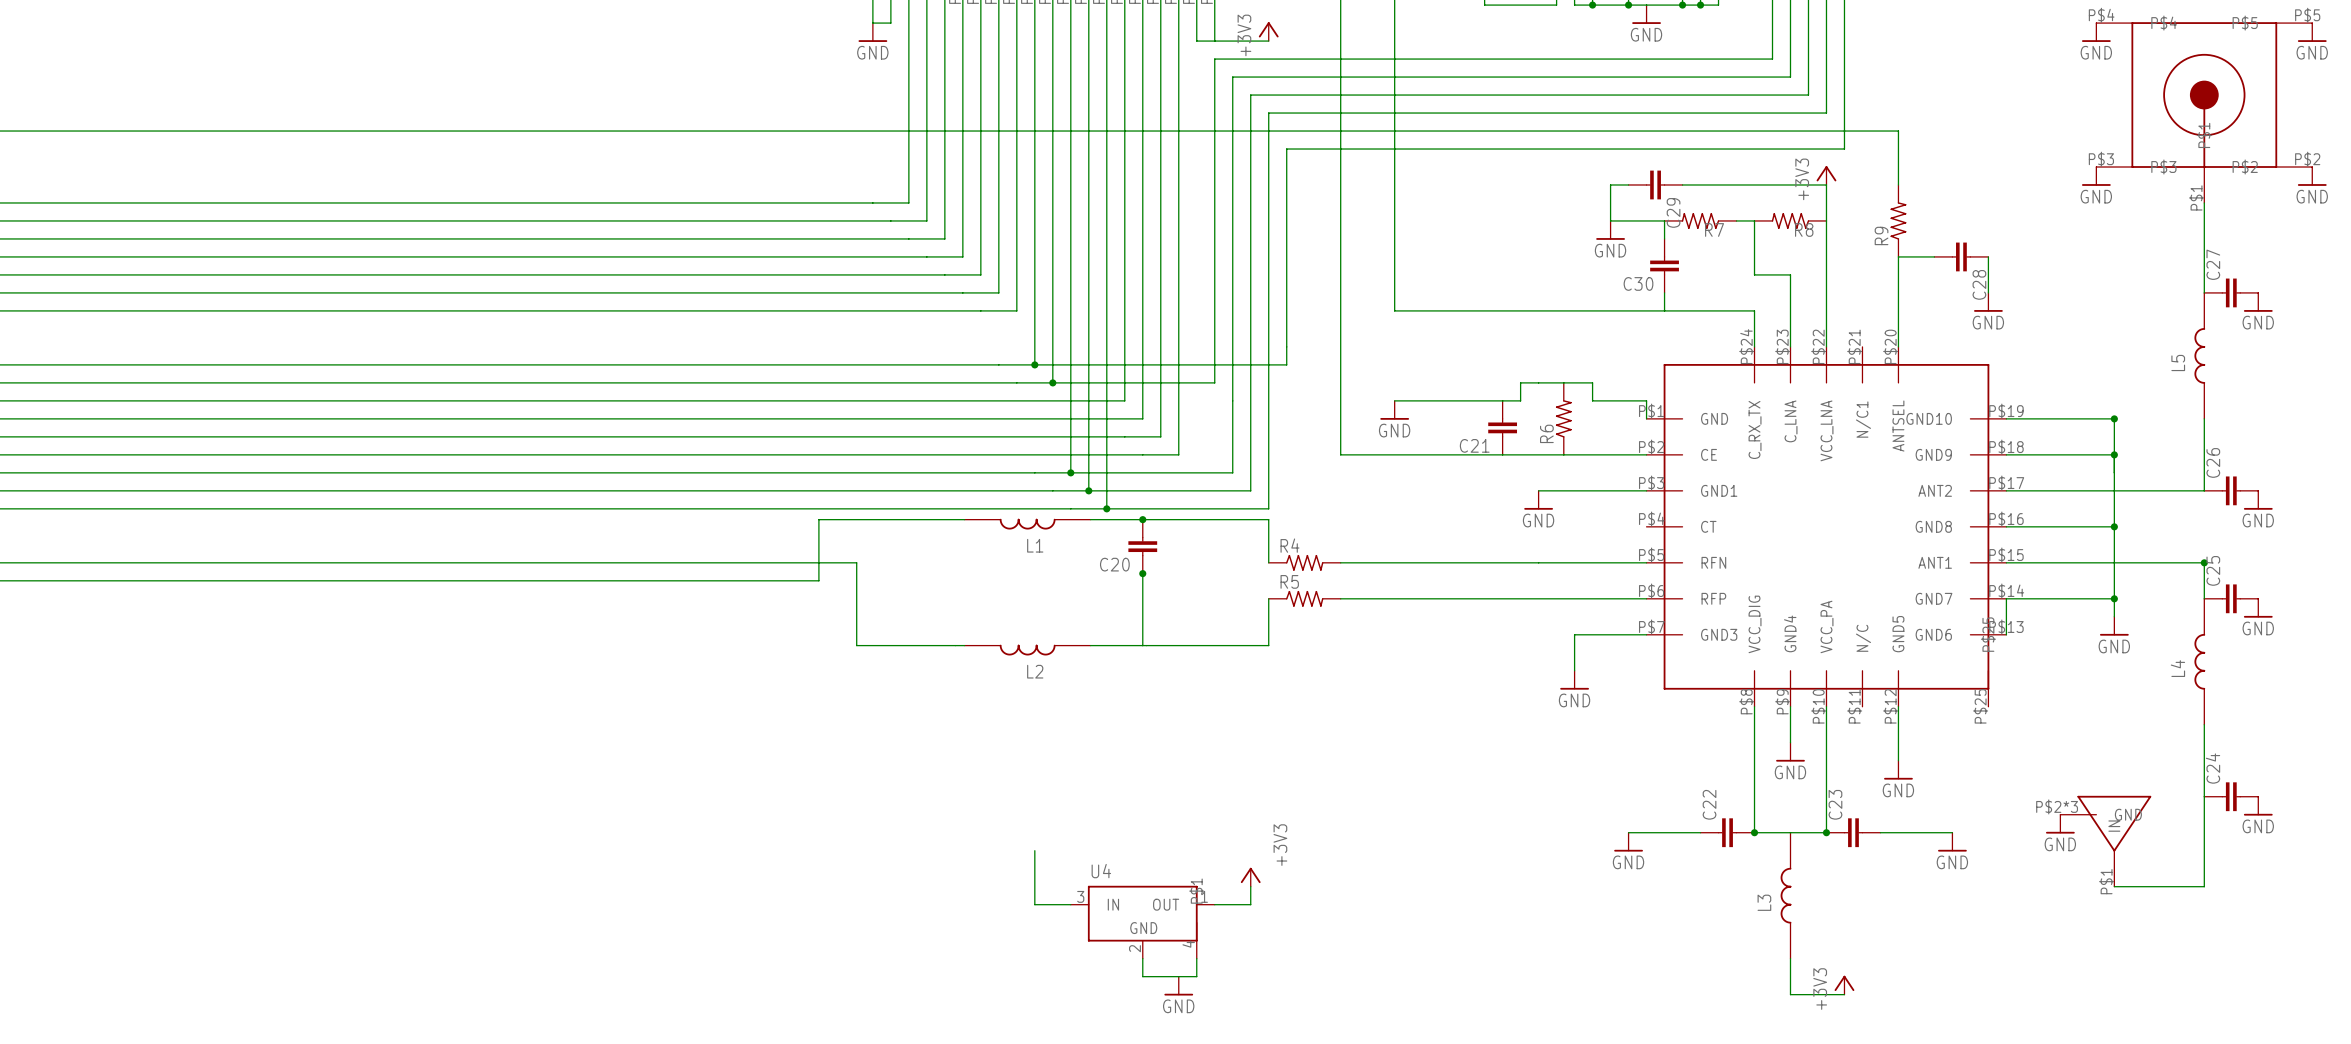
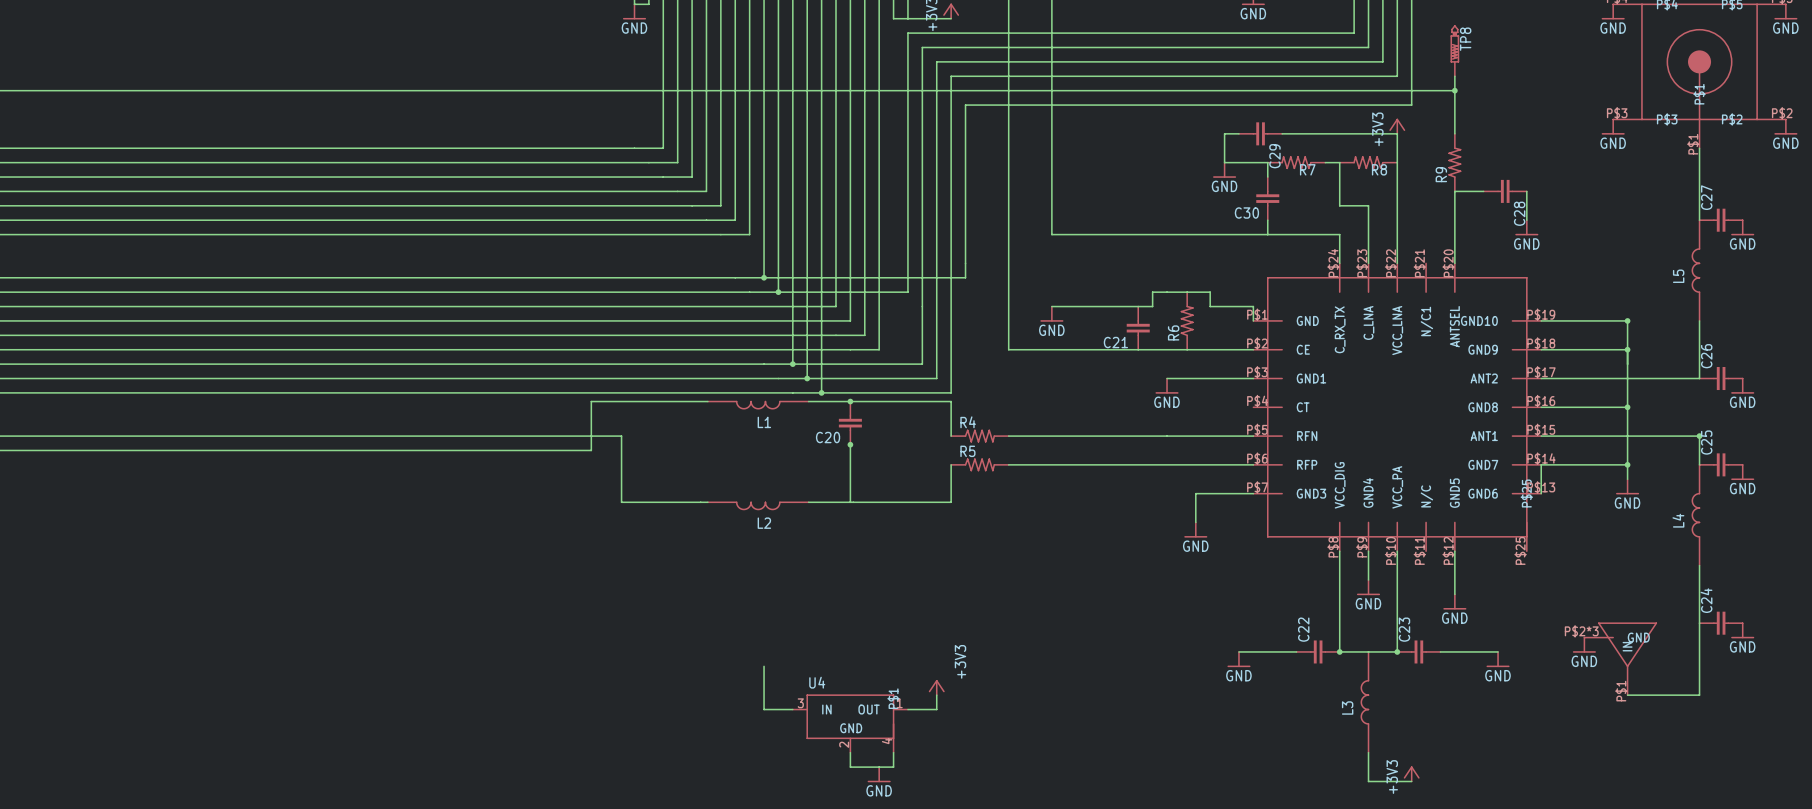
TP8: none -> (1454, 50)
wire: none -> (1454, 76) (1454, 90)
junction: none -> (1454, 90)

